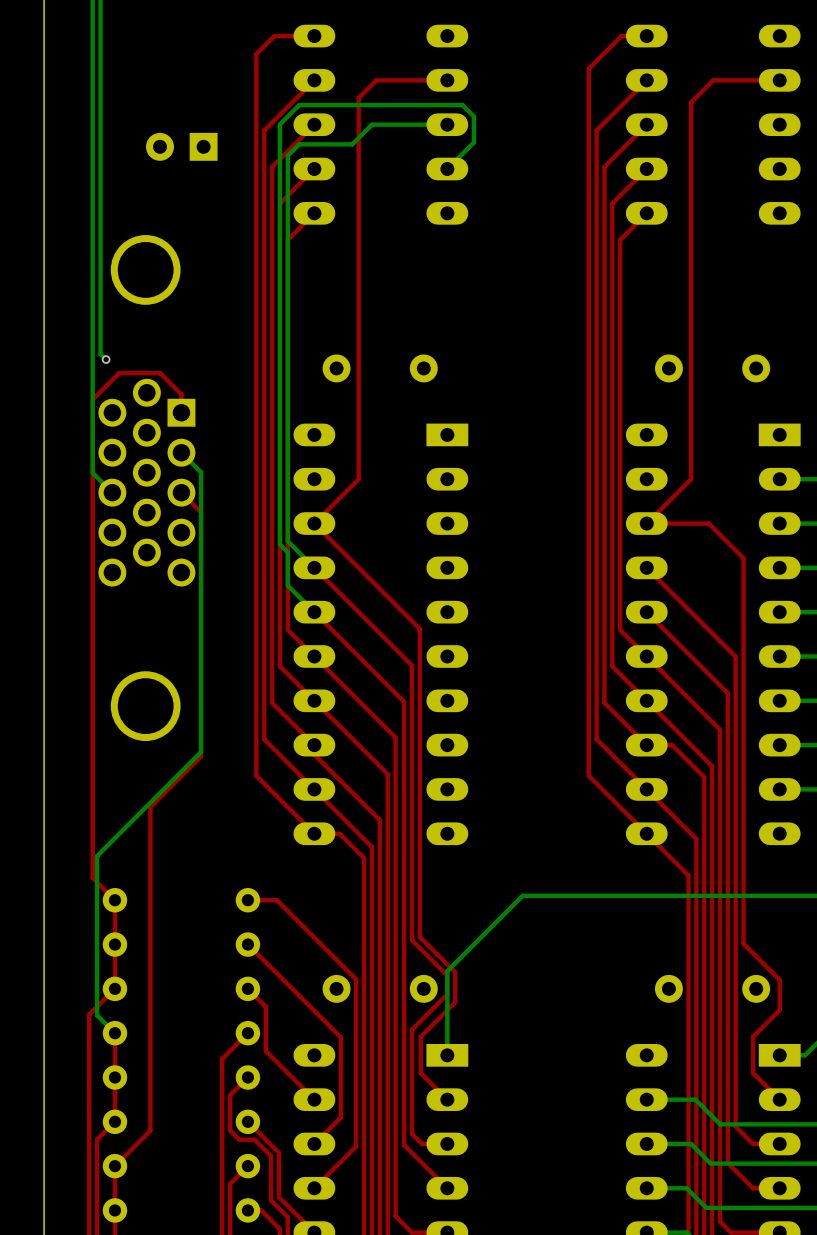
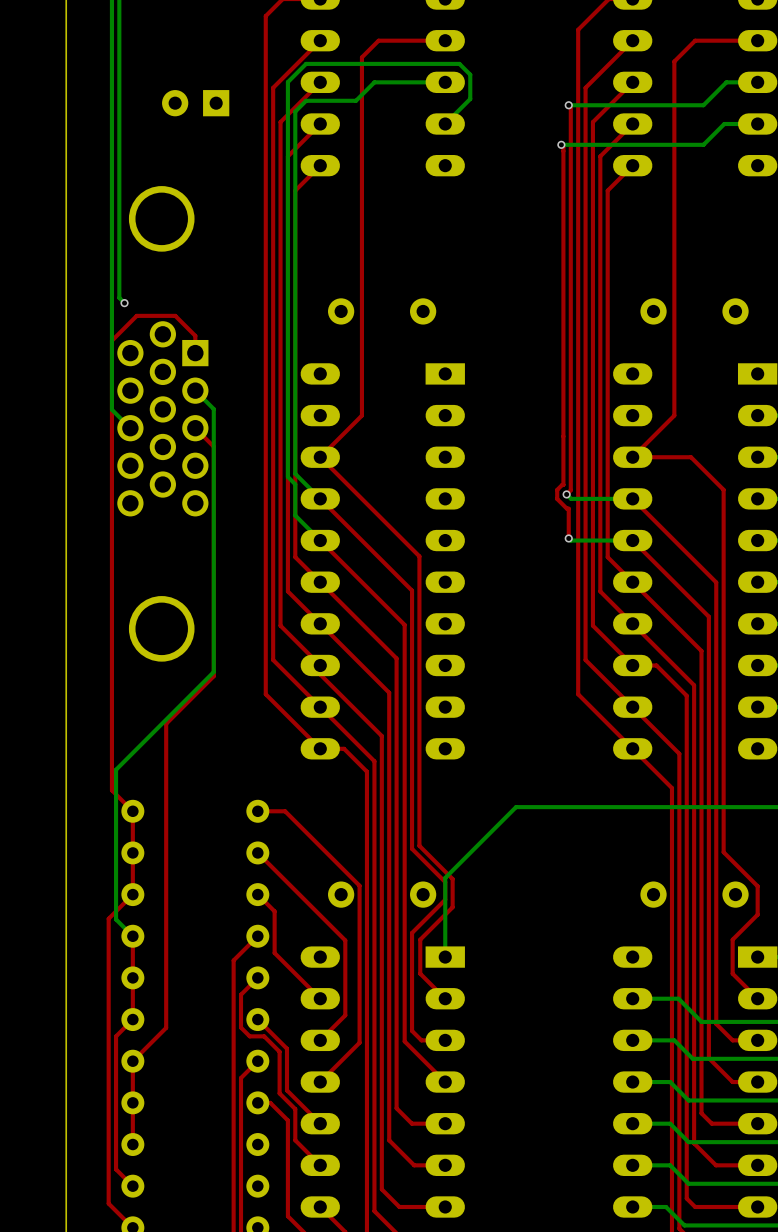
bottom track: none -> (757, 82) (726, 82) (703, 105) (568, 105)
top track: none -> (568, 105) (570, 107) (570, 490) (566, 494)
via: none -> (568, 105)
bottom track: none -> (757, 124) (724, 124) (703, 144) (561, 144)
top track: none -> (561, 144) (563, 146) (563, 484) (557, 489) (557, 498) (568, 508) (568, 538)
via: none -> (561, 144)
bottom track: none -> (566, 494) (571, 498) (632, 498)
via: none -> (566, 494)
bottom track: none -> (568, 538) (570, 540) (632, 540)
via: none -> (568, 538)

